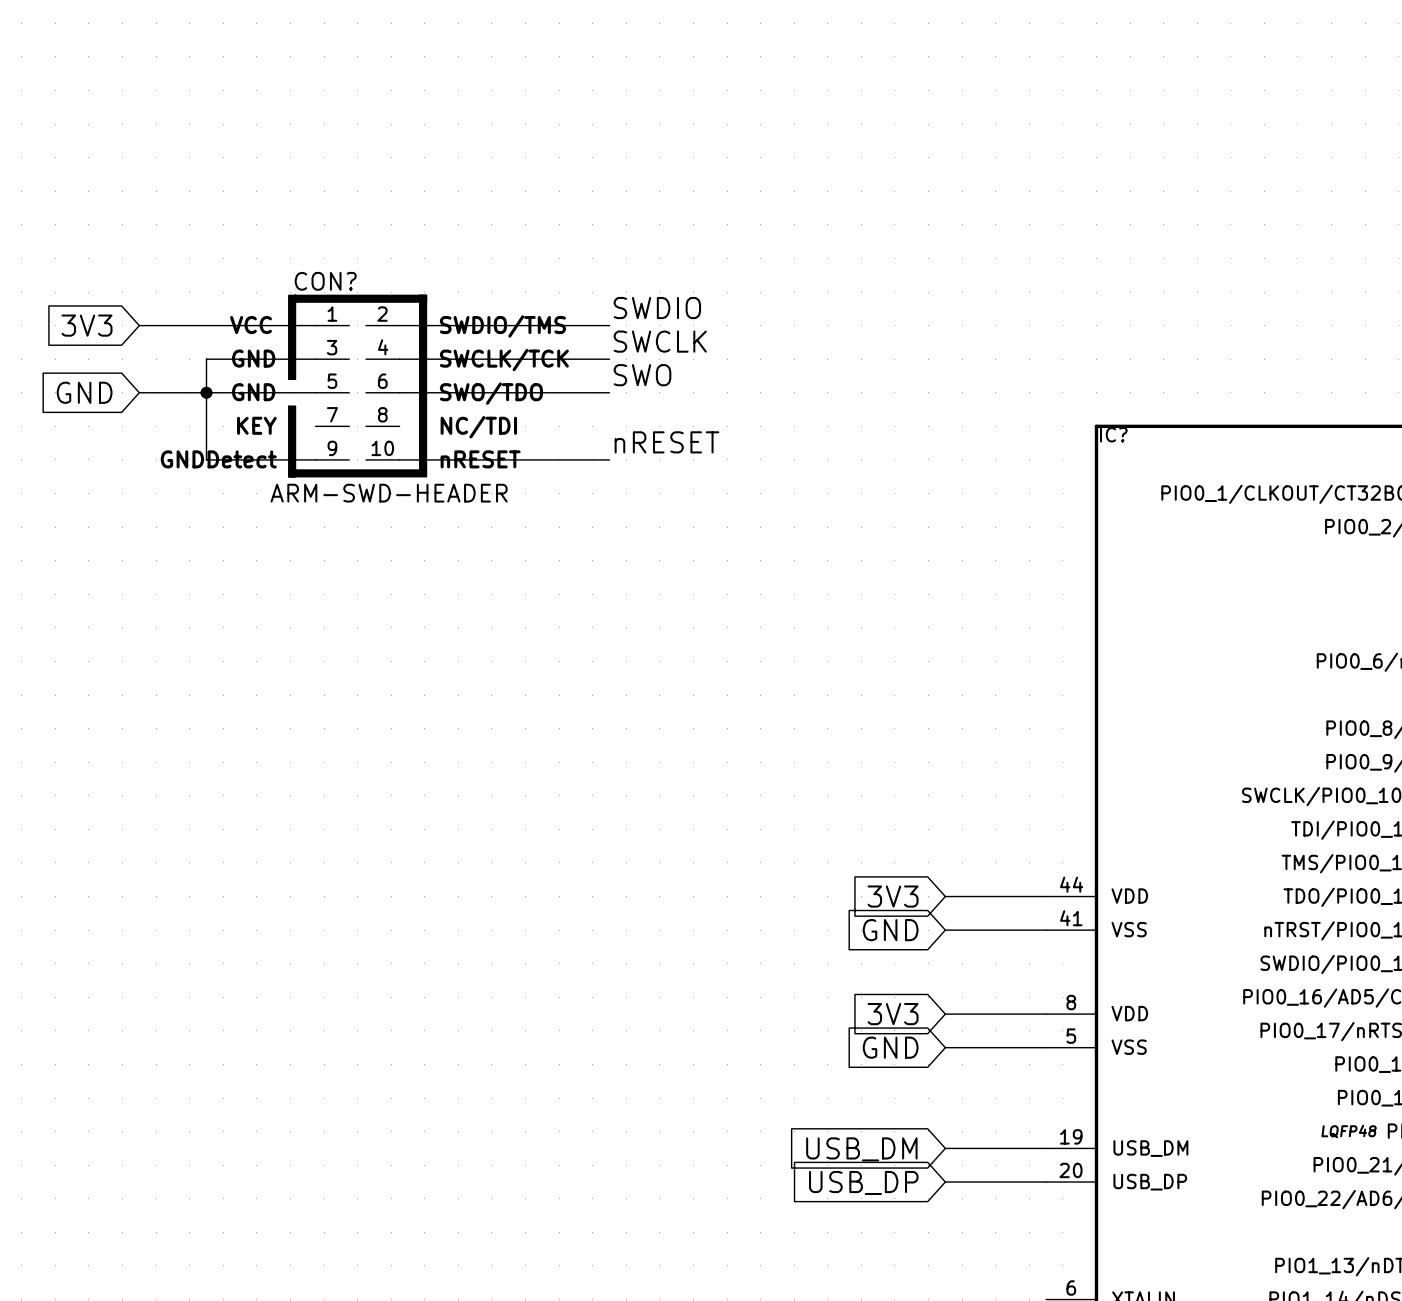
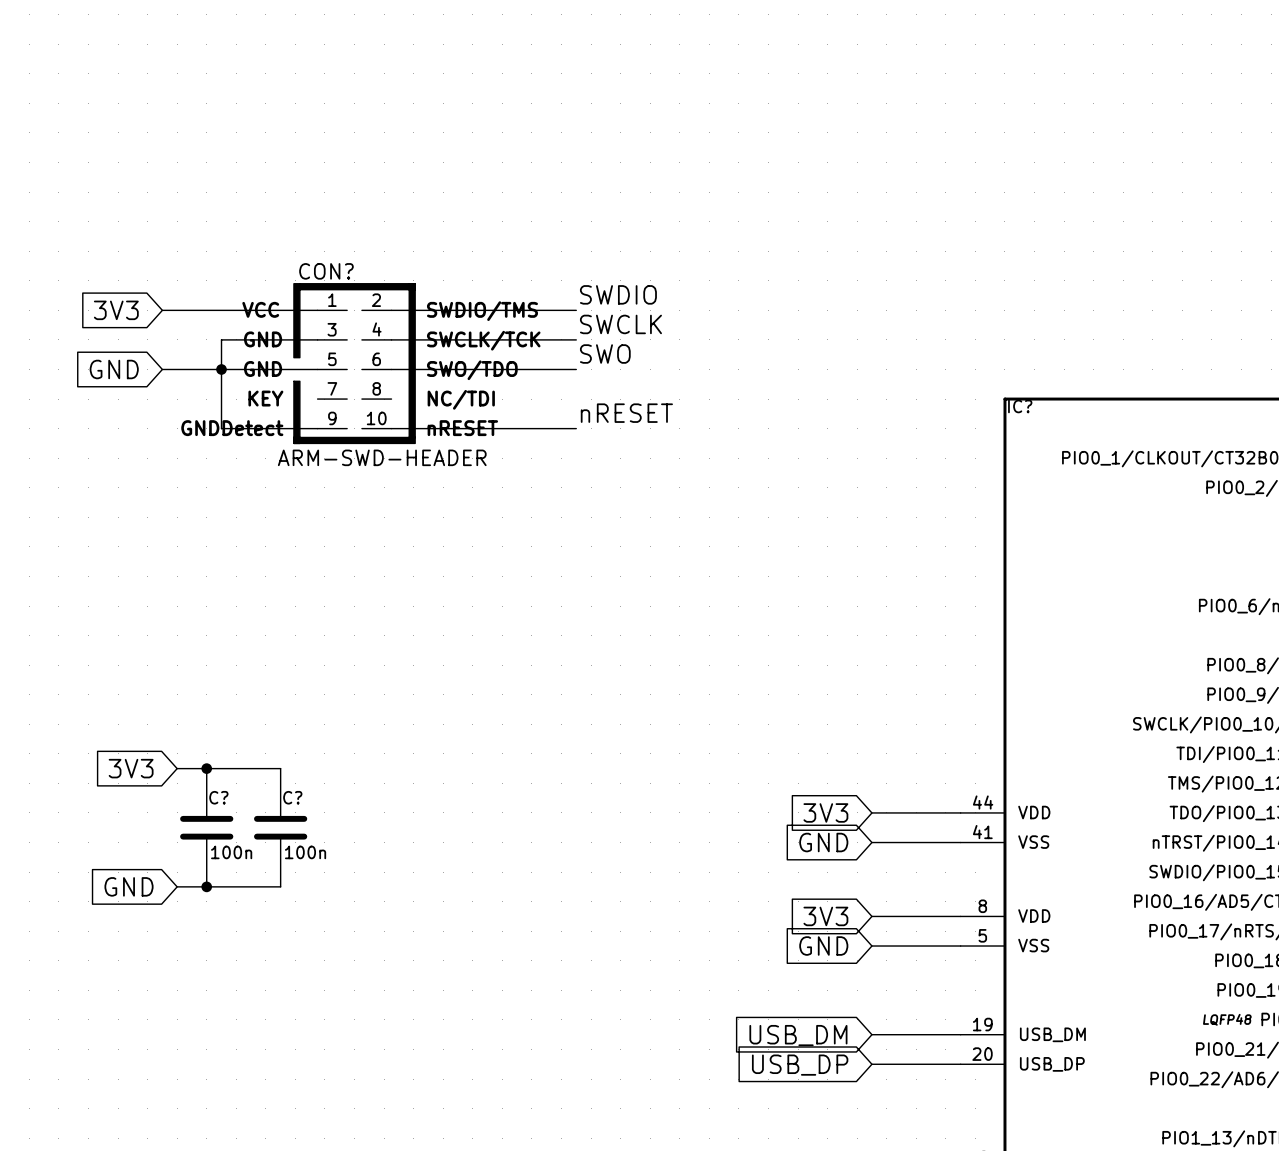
global label: none -> 3V3 (131, 768)
wire: none -> (177, 768) (280, 768)
junction: none -> (206, 768)
C?: none -> 100n (206, 827)
C?: none -> 100n (280, 827)
global label: none -> GND (129, 886)
wire: none -> (177, 886) (280, 886)
junction: none -> (206, 886)

